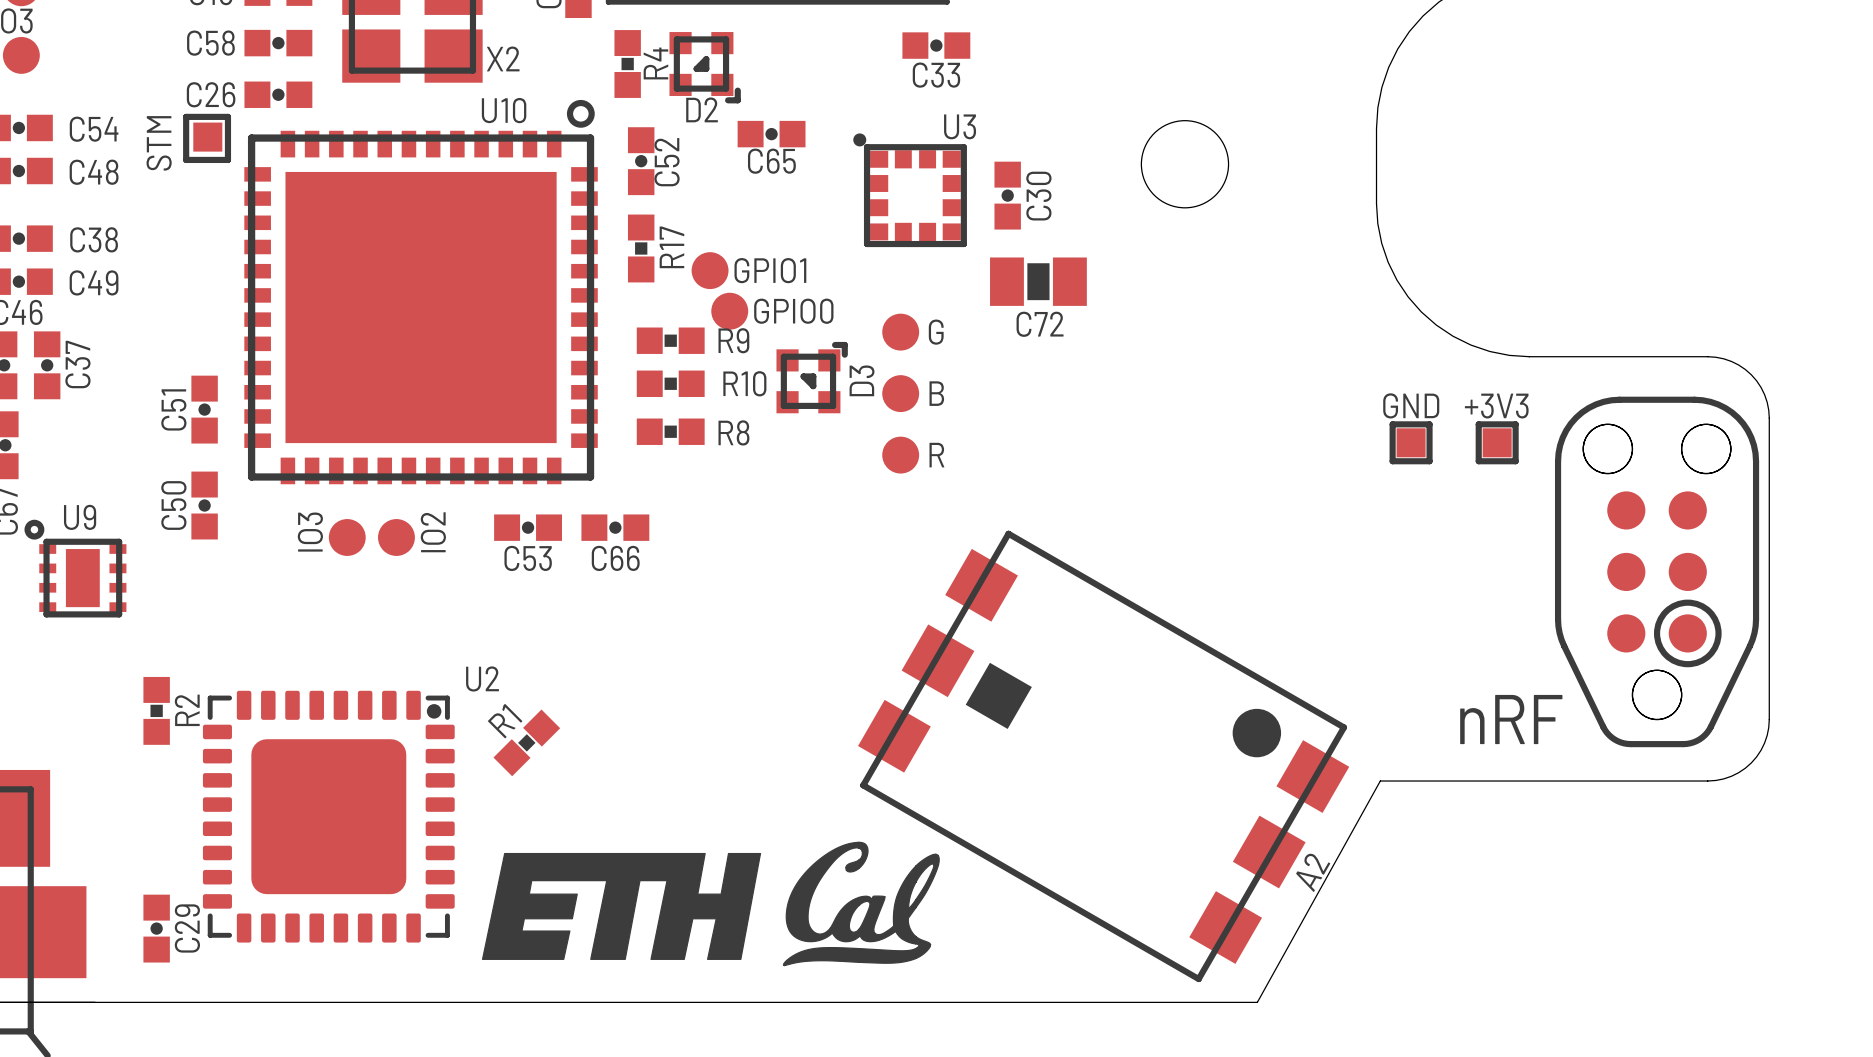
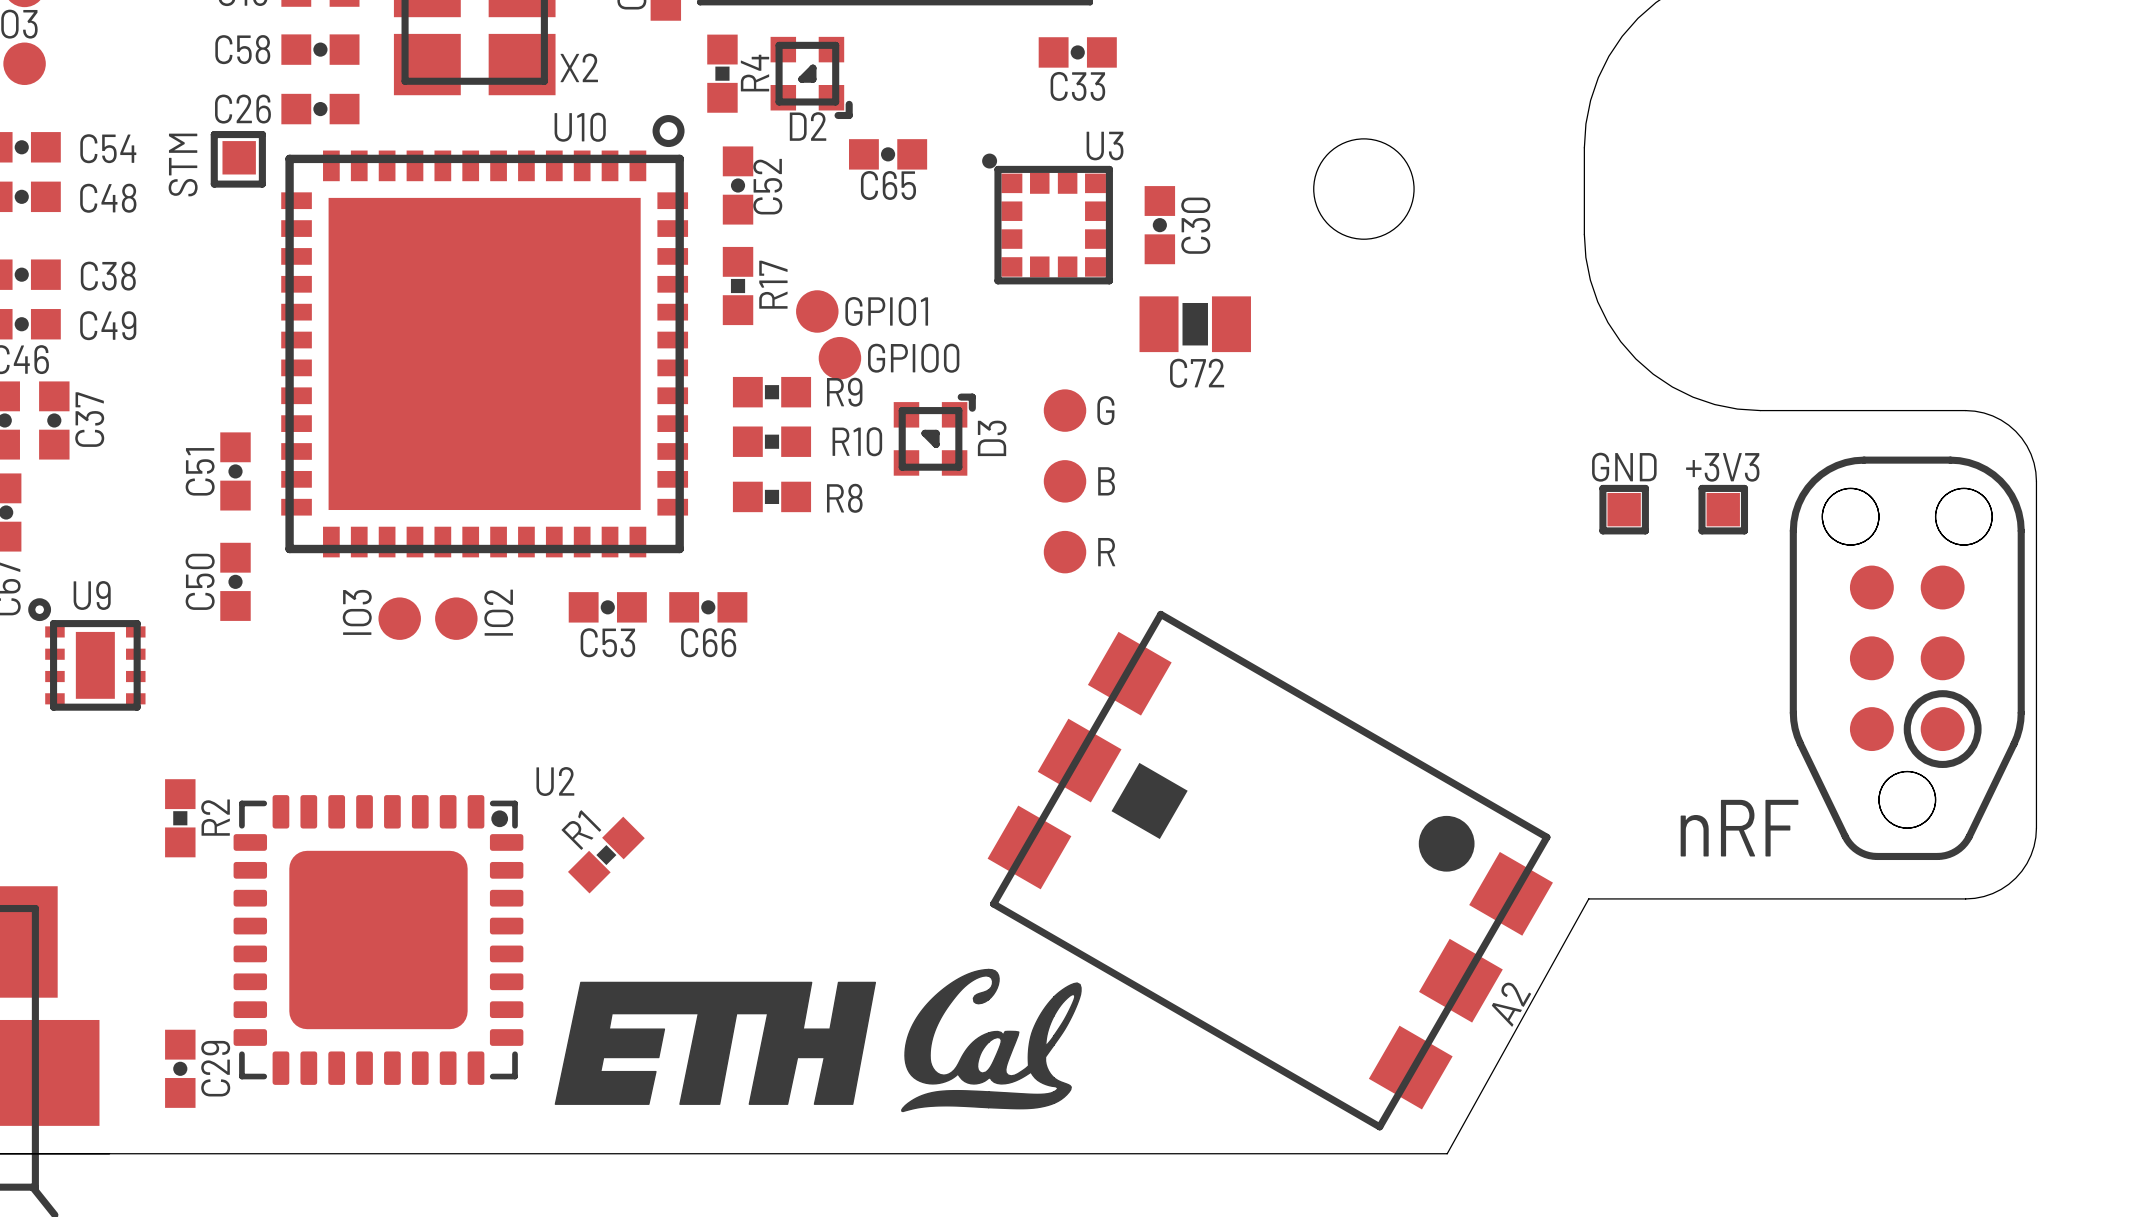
part: (900, 332) -> none
text position: G (936, 332) -> G (1105, 410)
part: none -> (1065, 410)
part: (900, 393) -> none
text position: B (936, 393) -> B (1106, 481)
part: none -> (1065, 481)
part: (900, 455) -> none
text position: R (936, 455) -> R (1106, 552)
part: none -> (1065, 552)

